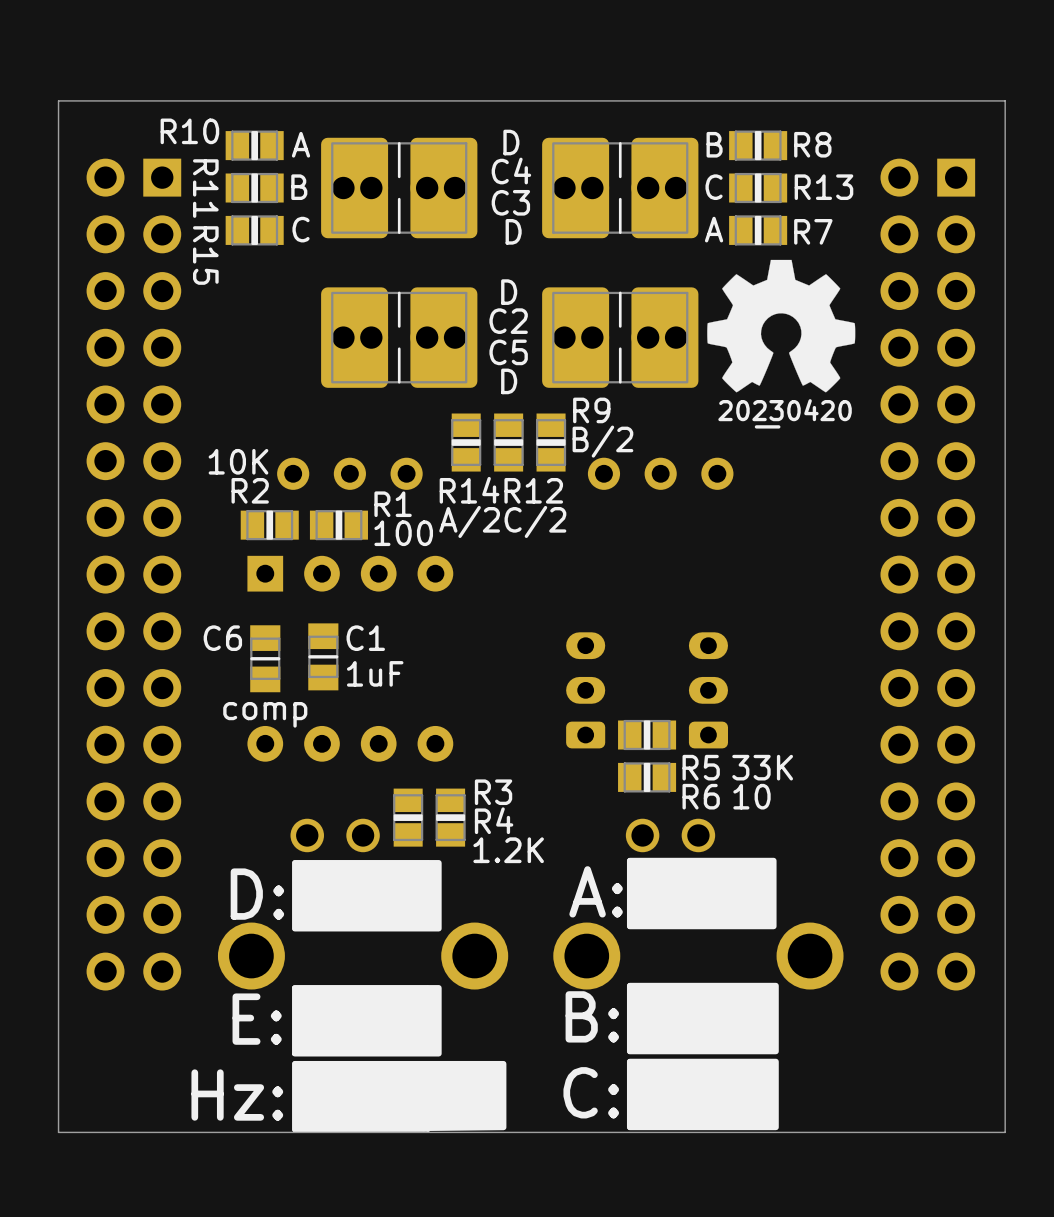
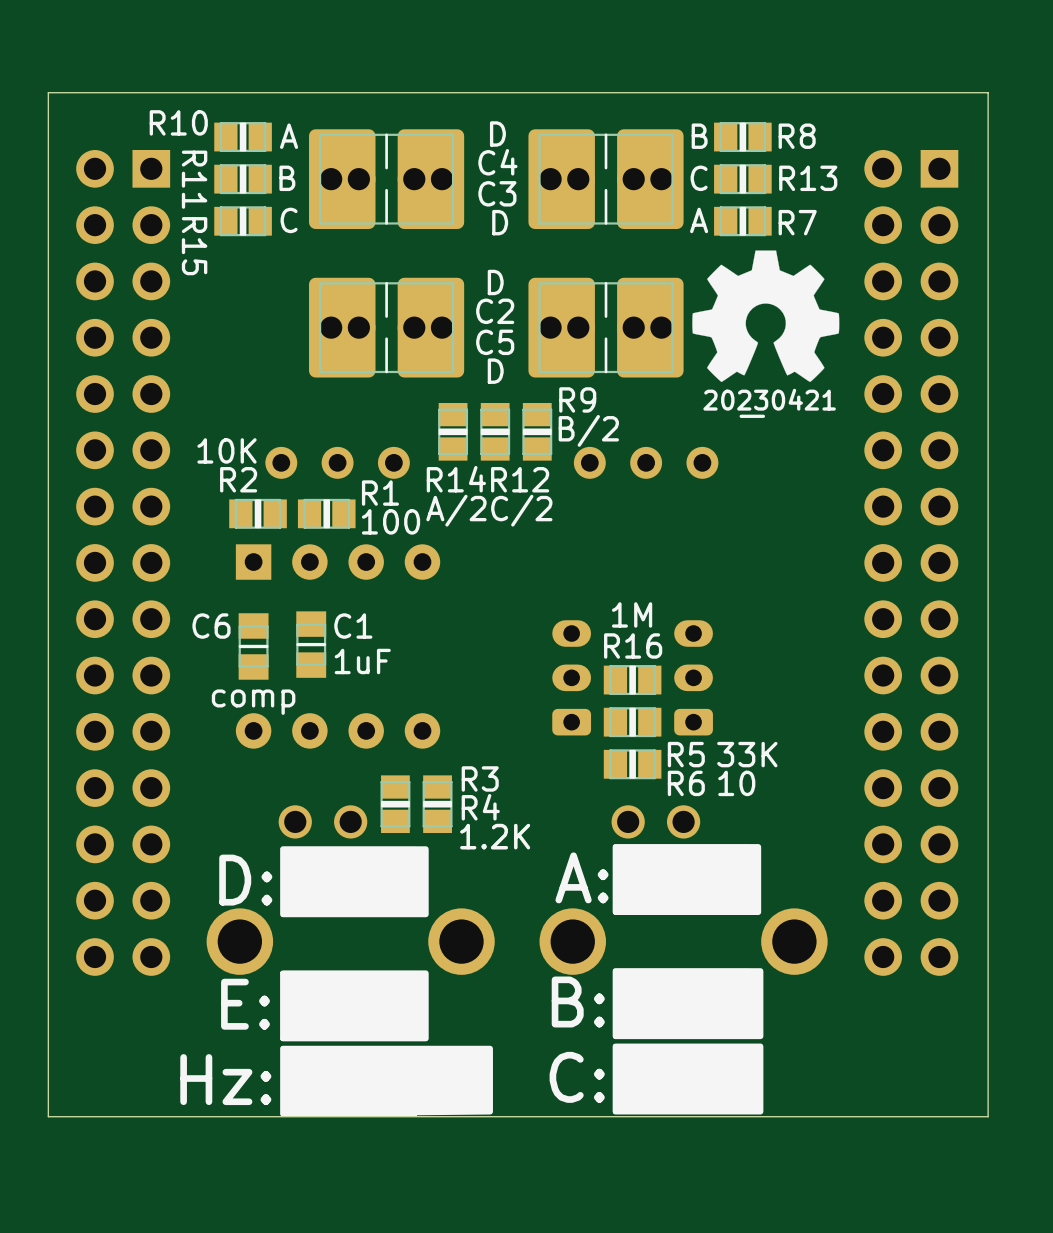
drawing shape: [718, 399, 852, 429] -> [703, 388, 836, 418]
R16: none -> 1M (632, 680)

